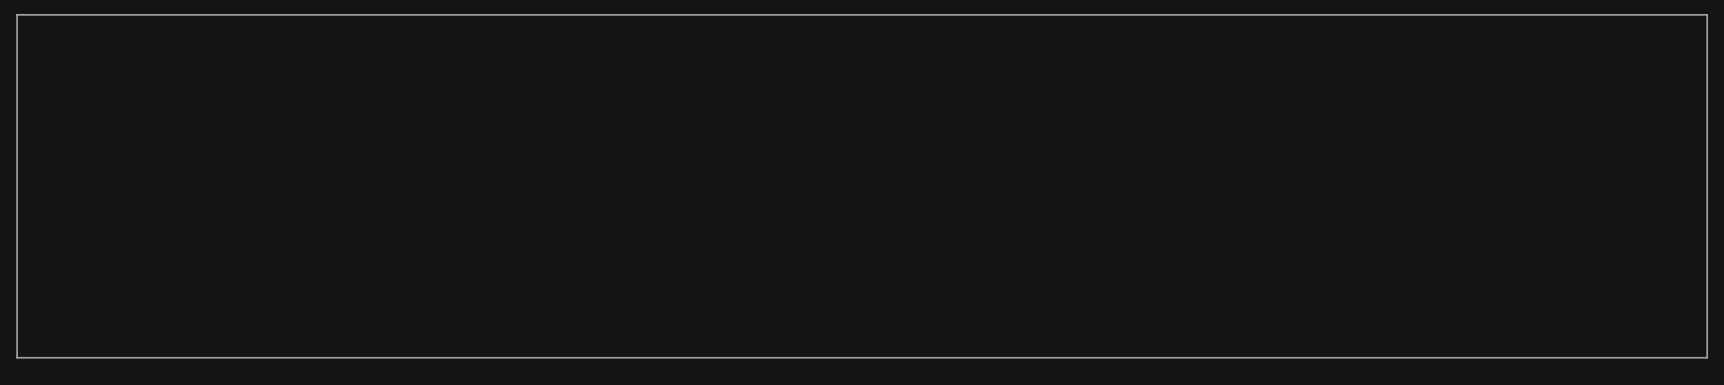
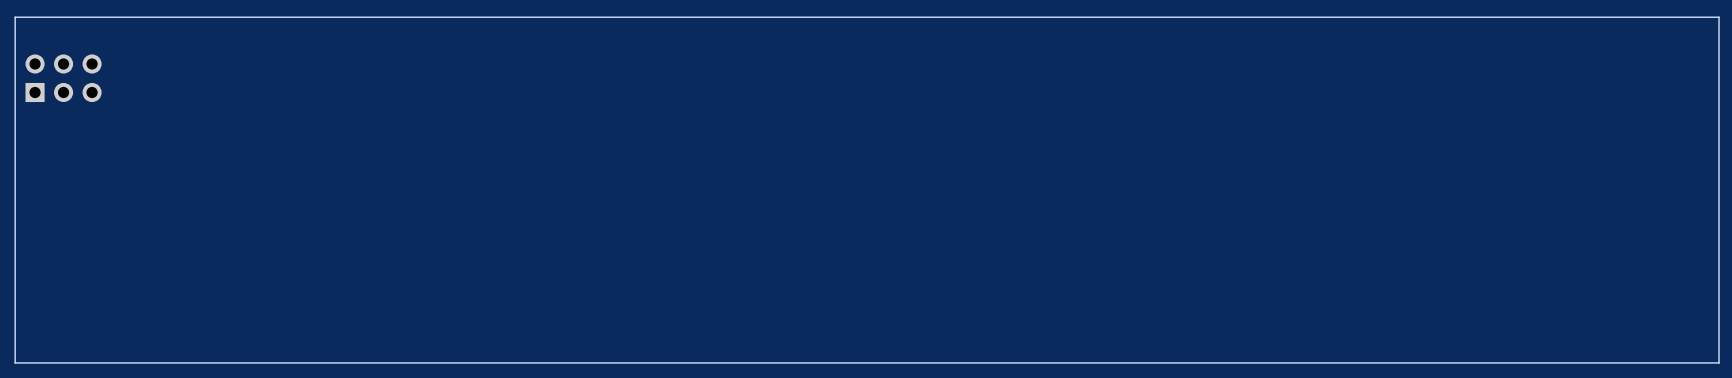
part: none -> (63, 78)

